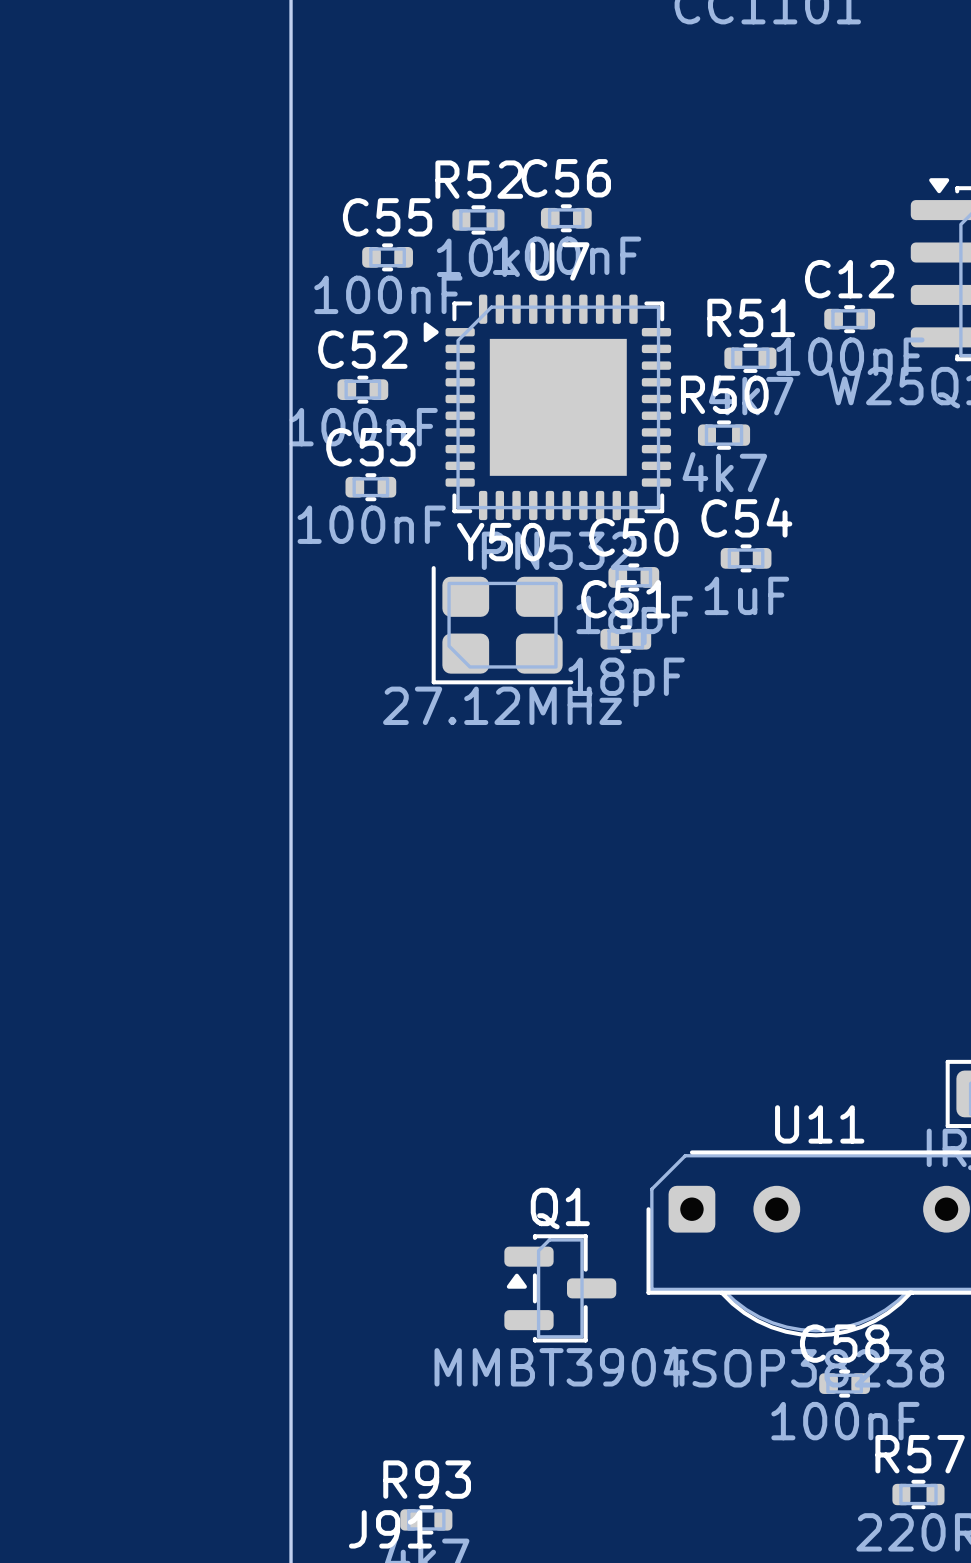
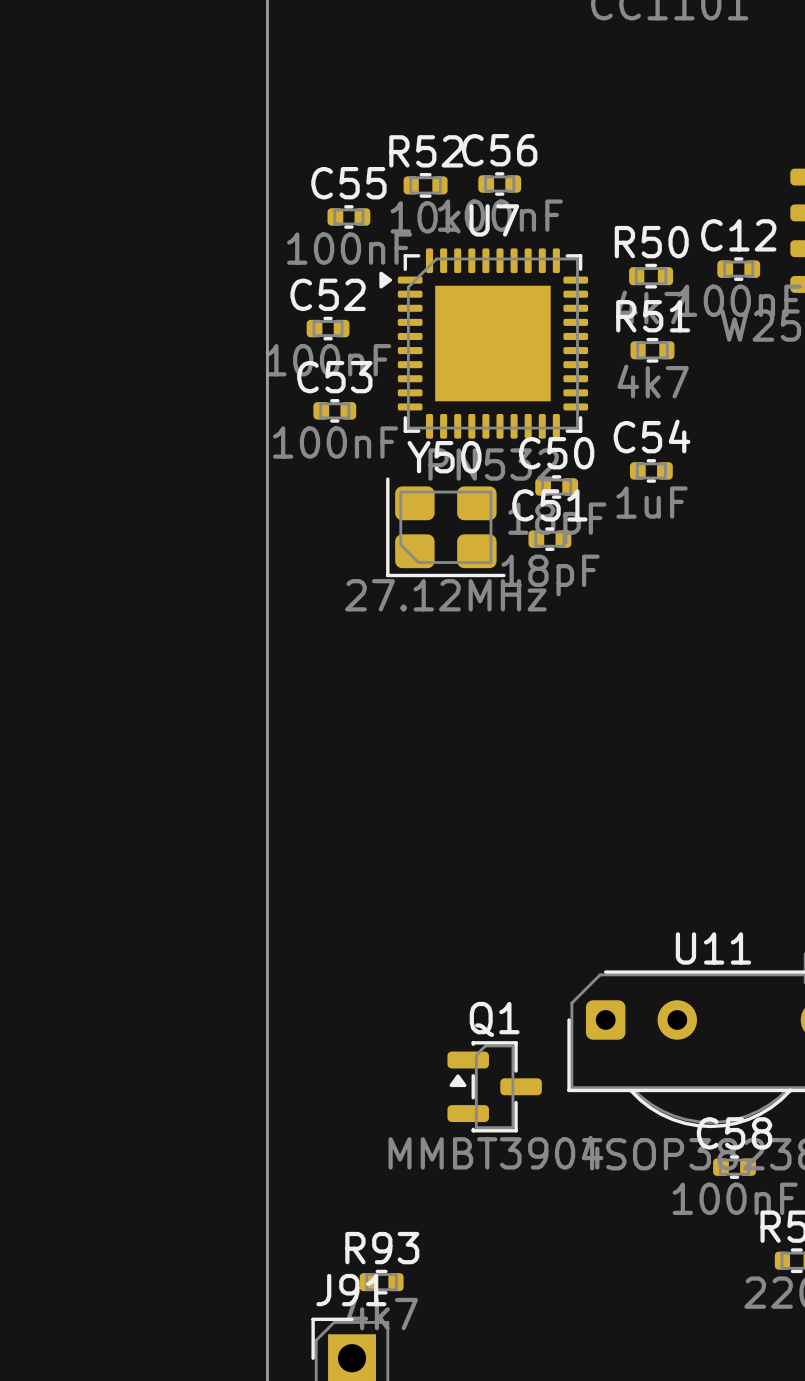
R51 position: (750, 358) -> (652, 350)
R50 position: (724, 435) -> (651, 276)

